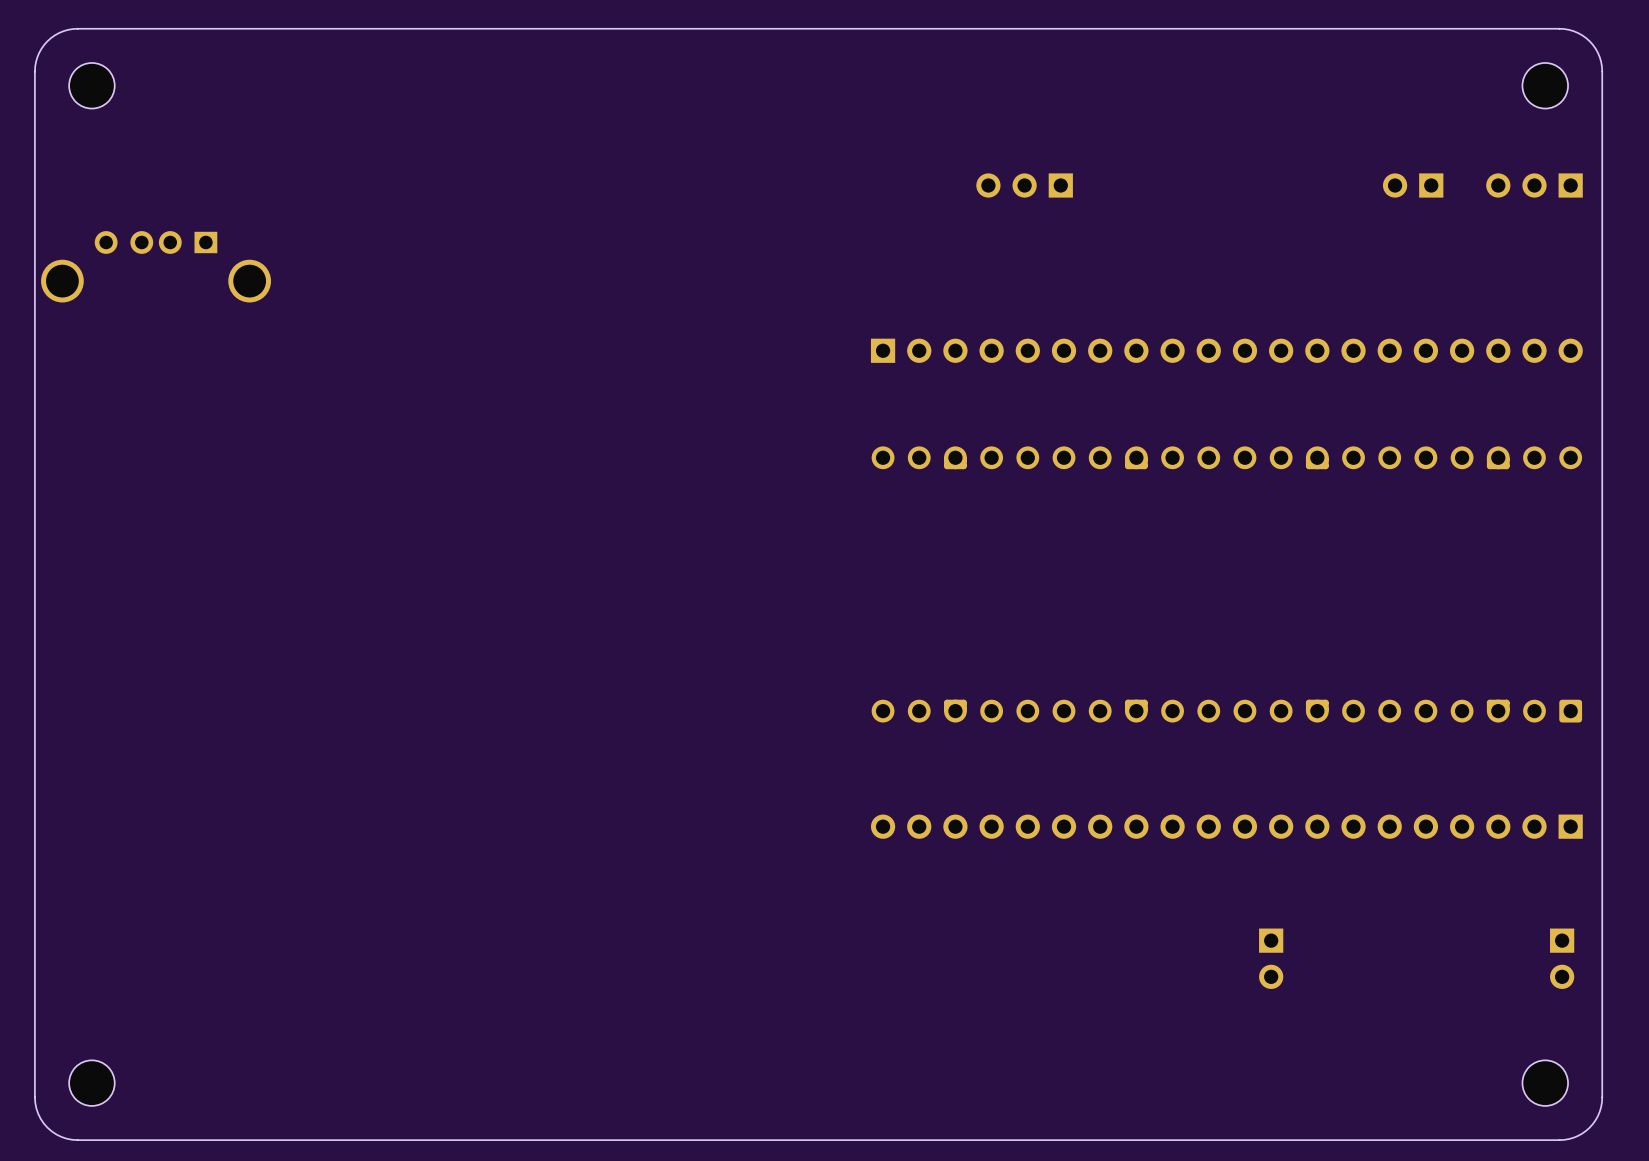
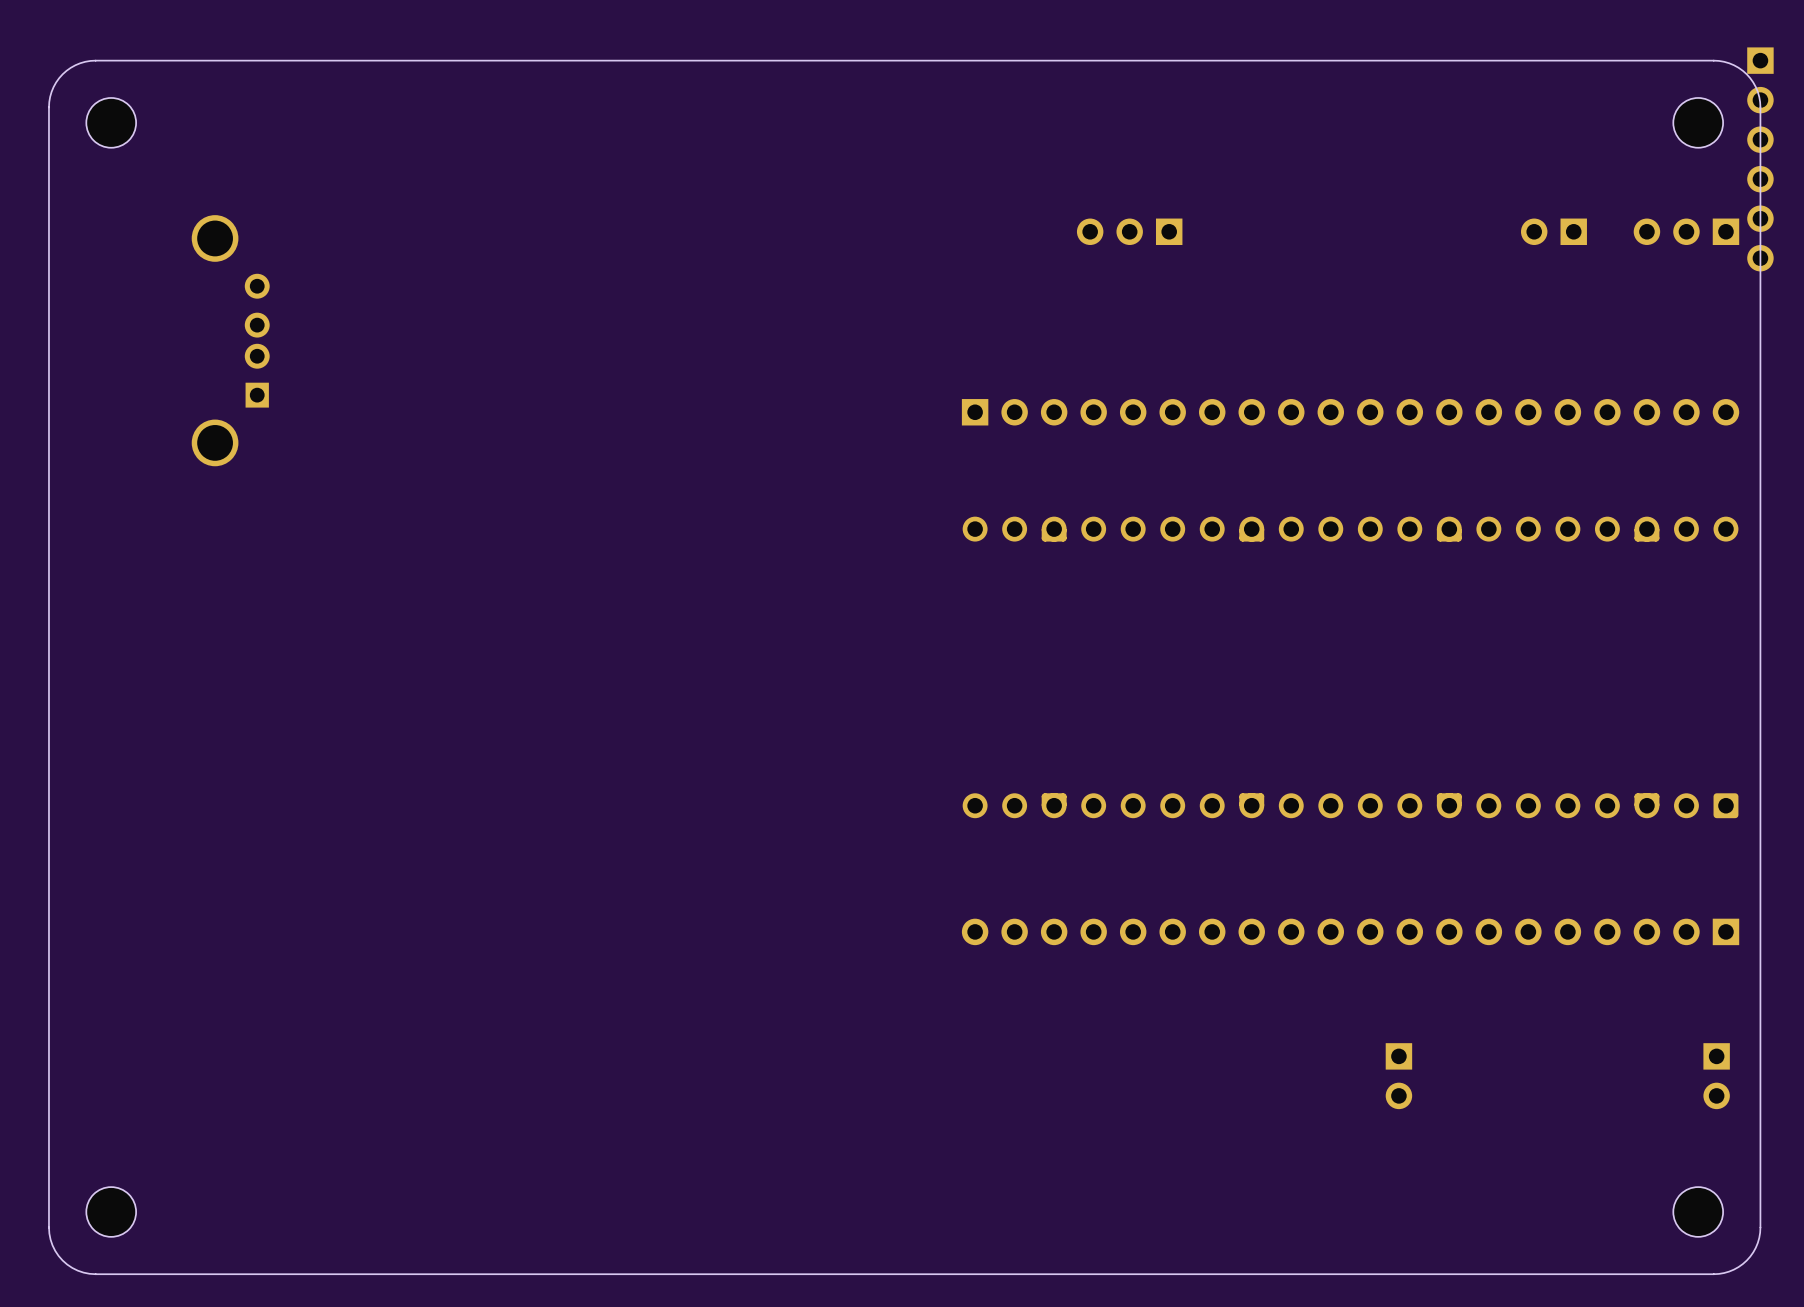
part: none -> (1760, 159)
part rotation: 0° (156, 266) -> 90° clockwise (230, 340)

